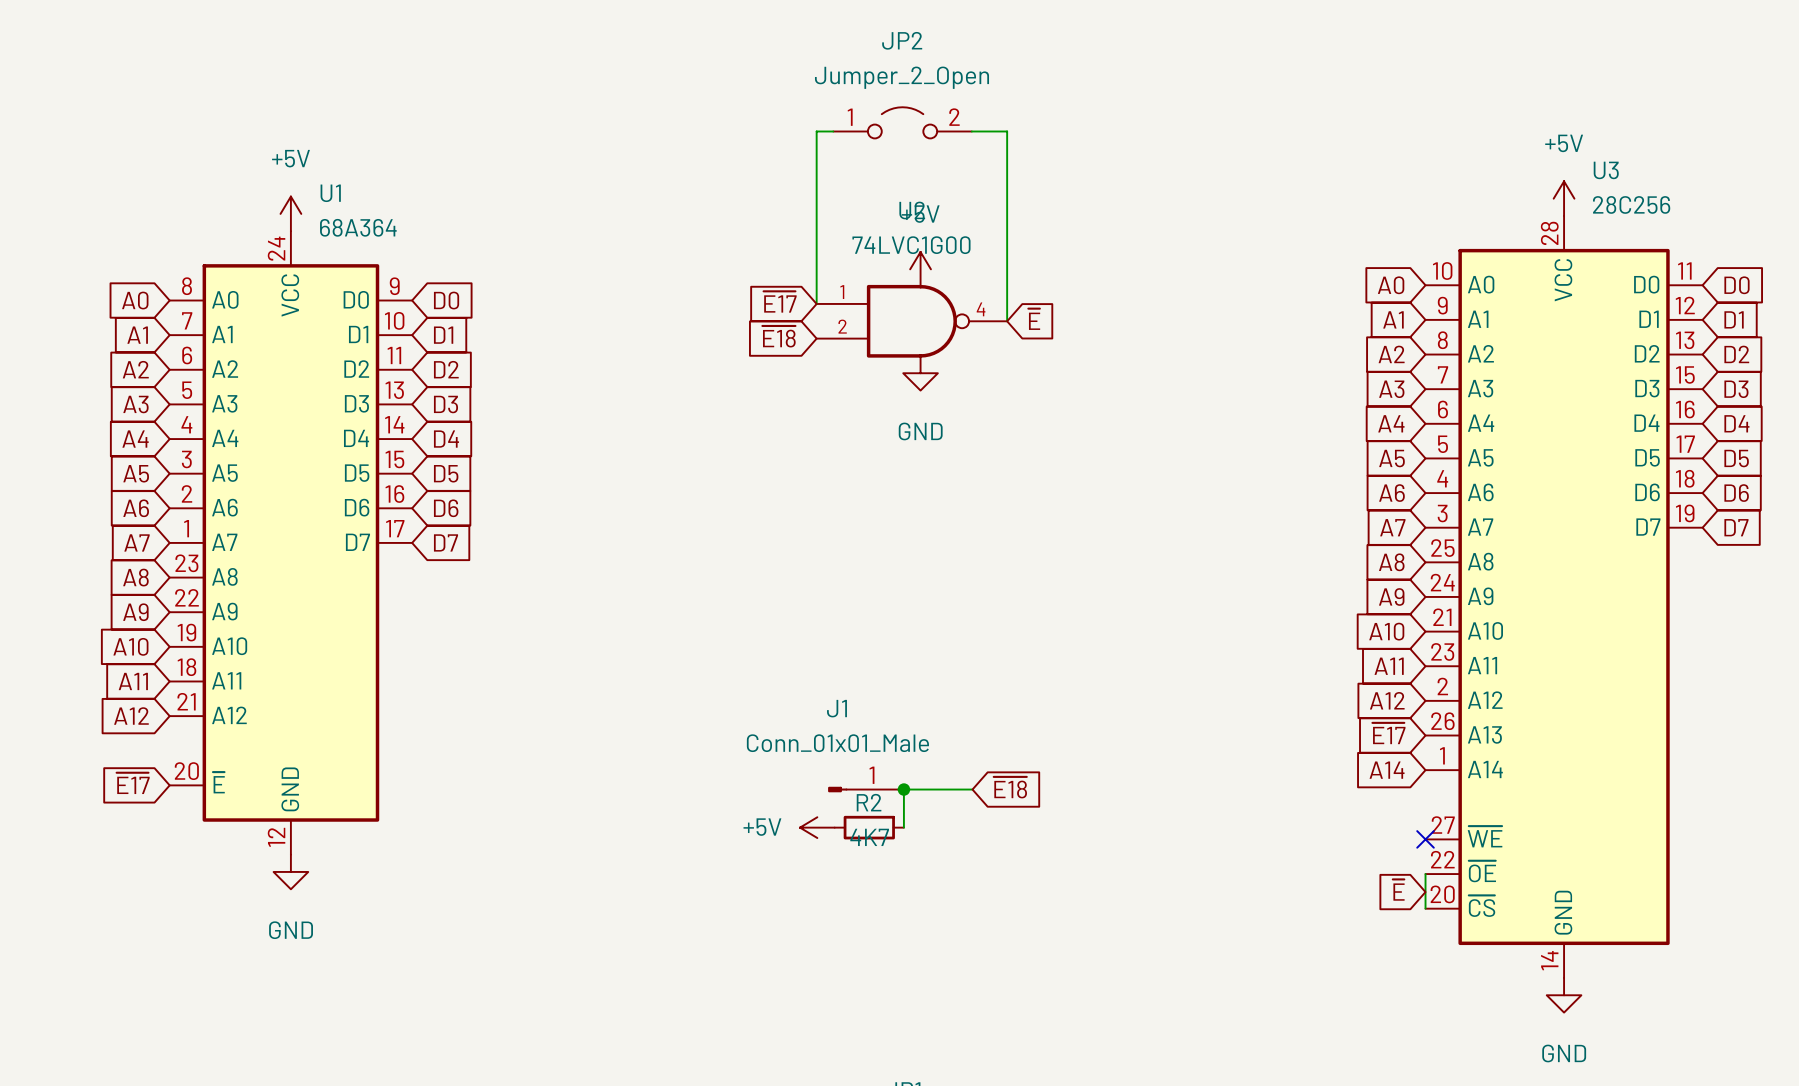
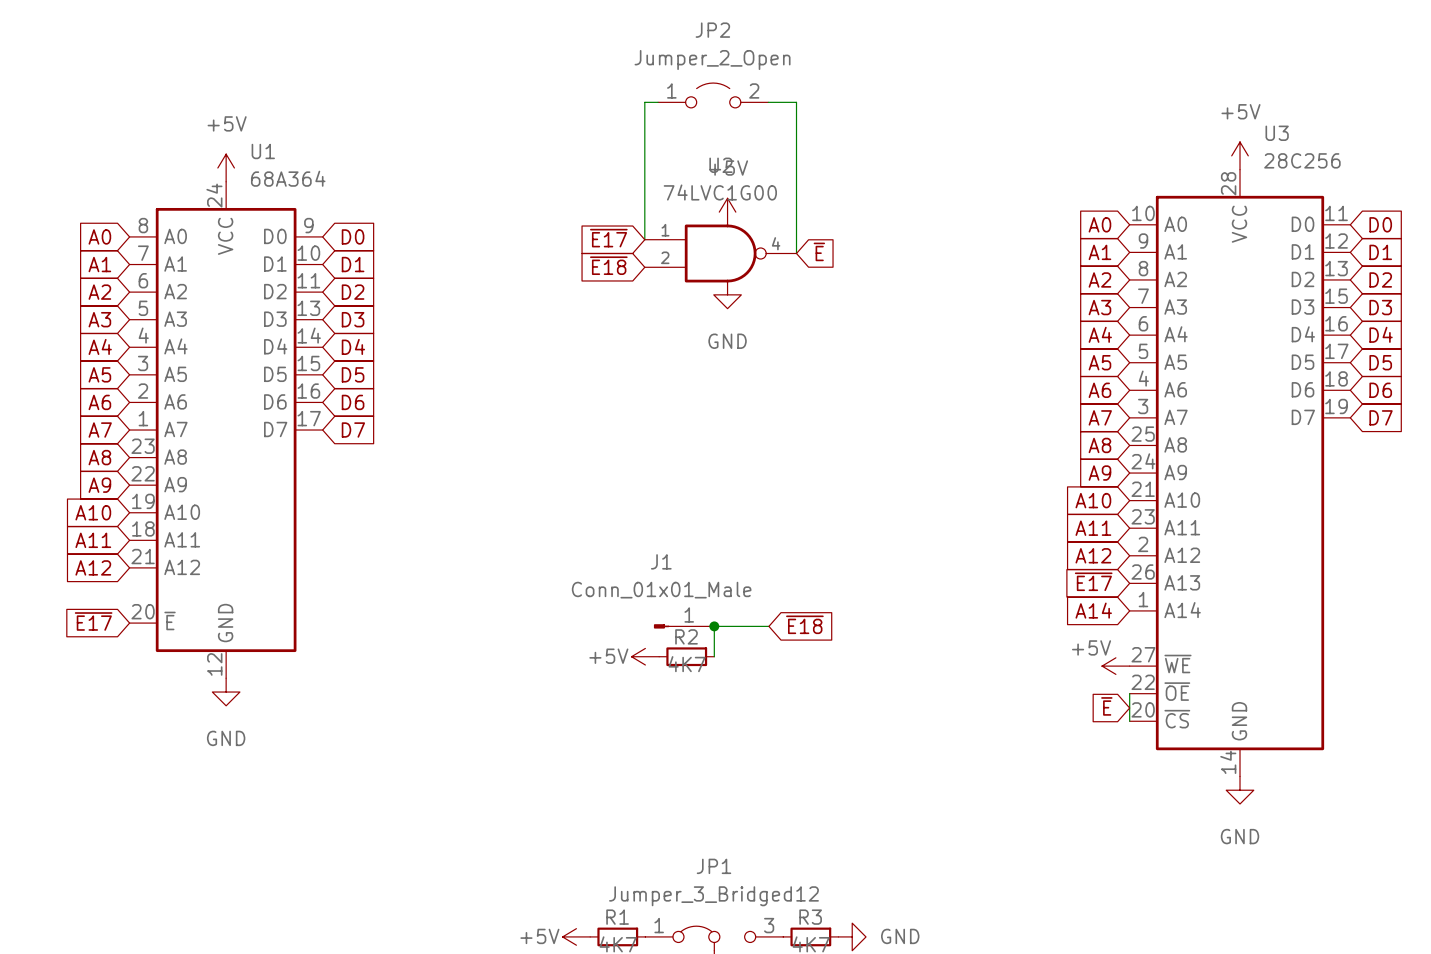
power symbol: none -> +5V (1115, 666)
no-connect mark: (1425, 839) -> none

